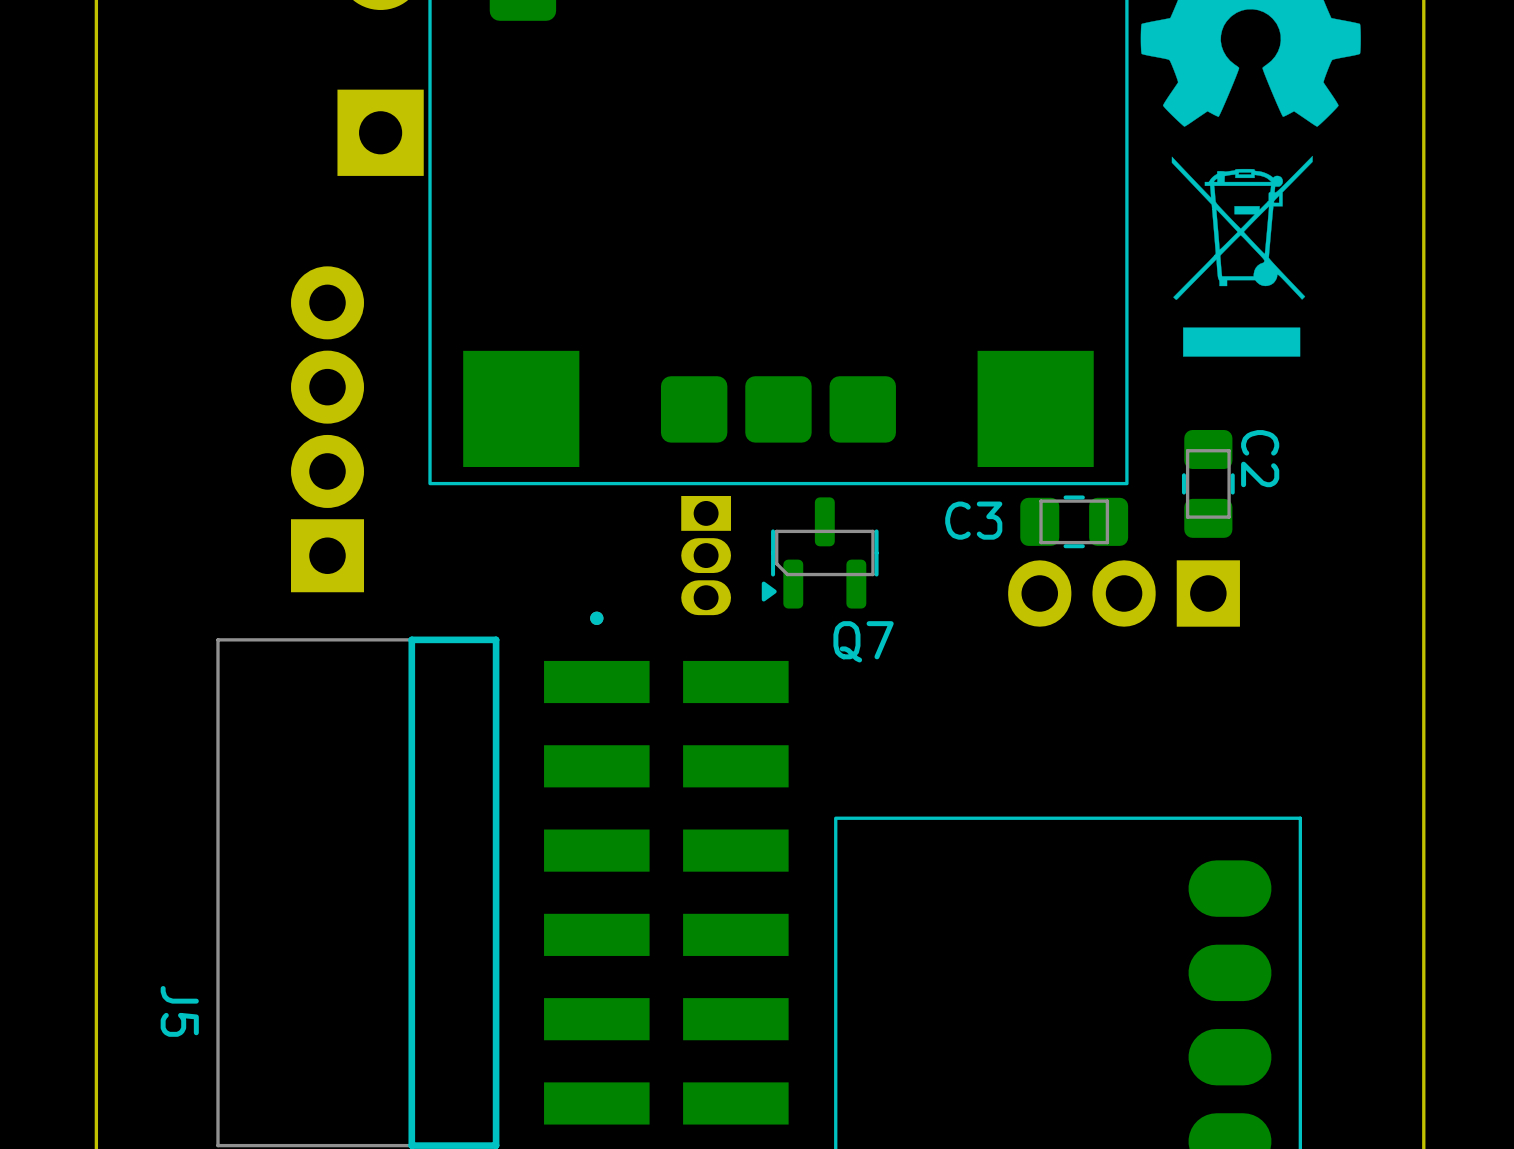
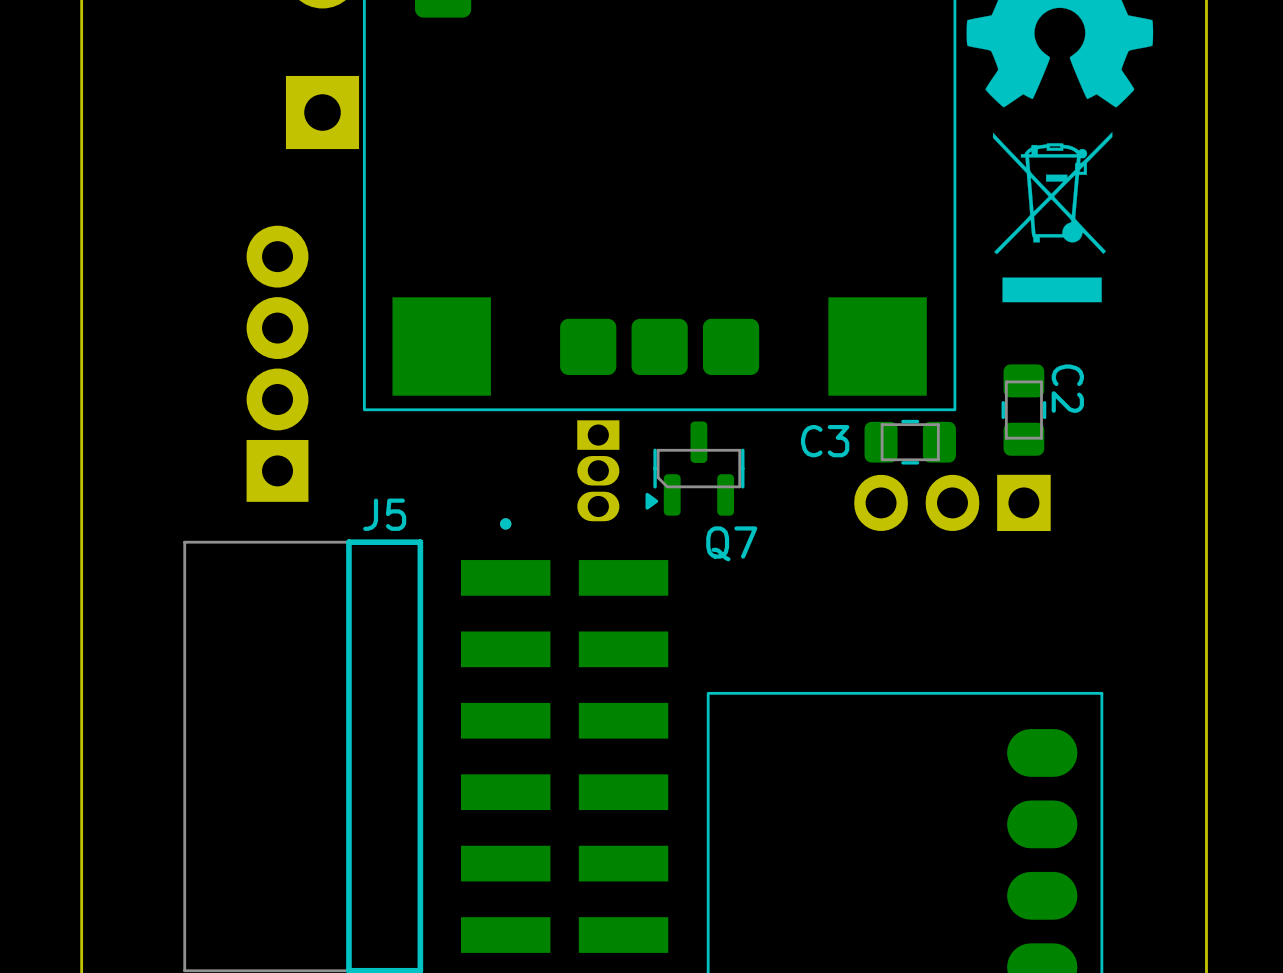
J5 name rotation: 0° (179, 1011) -> 90° counterclockwise (384, 514)
J5 name position: J5 (179, 1011) -> J5 (384, 514)

